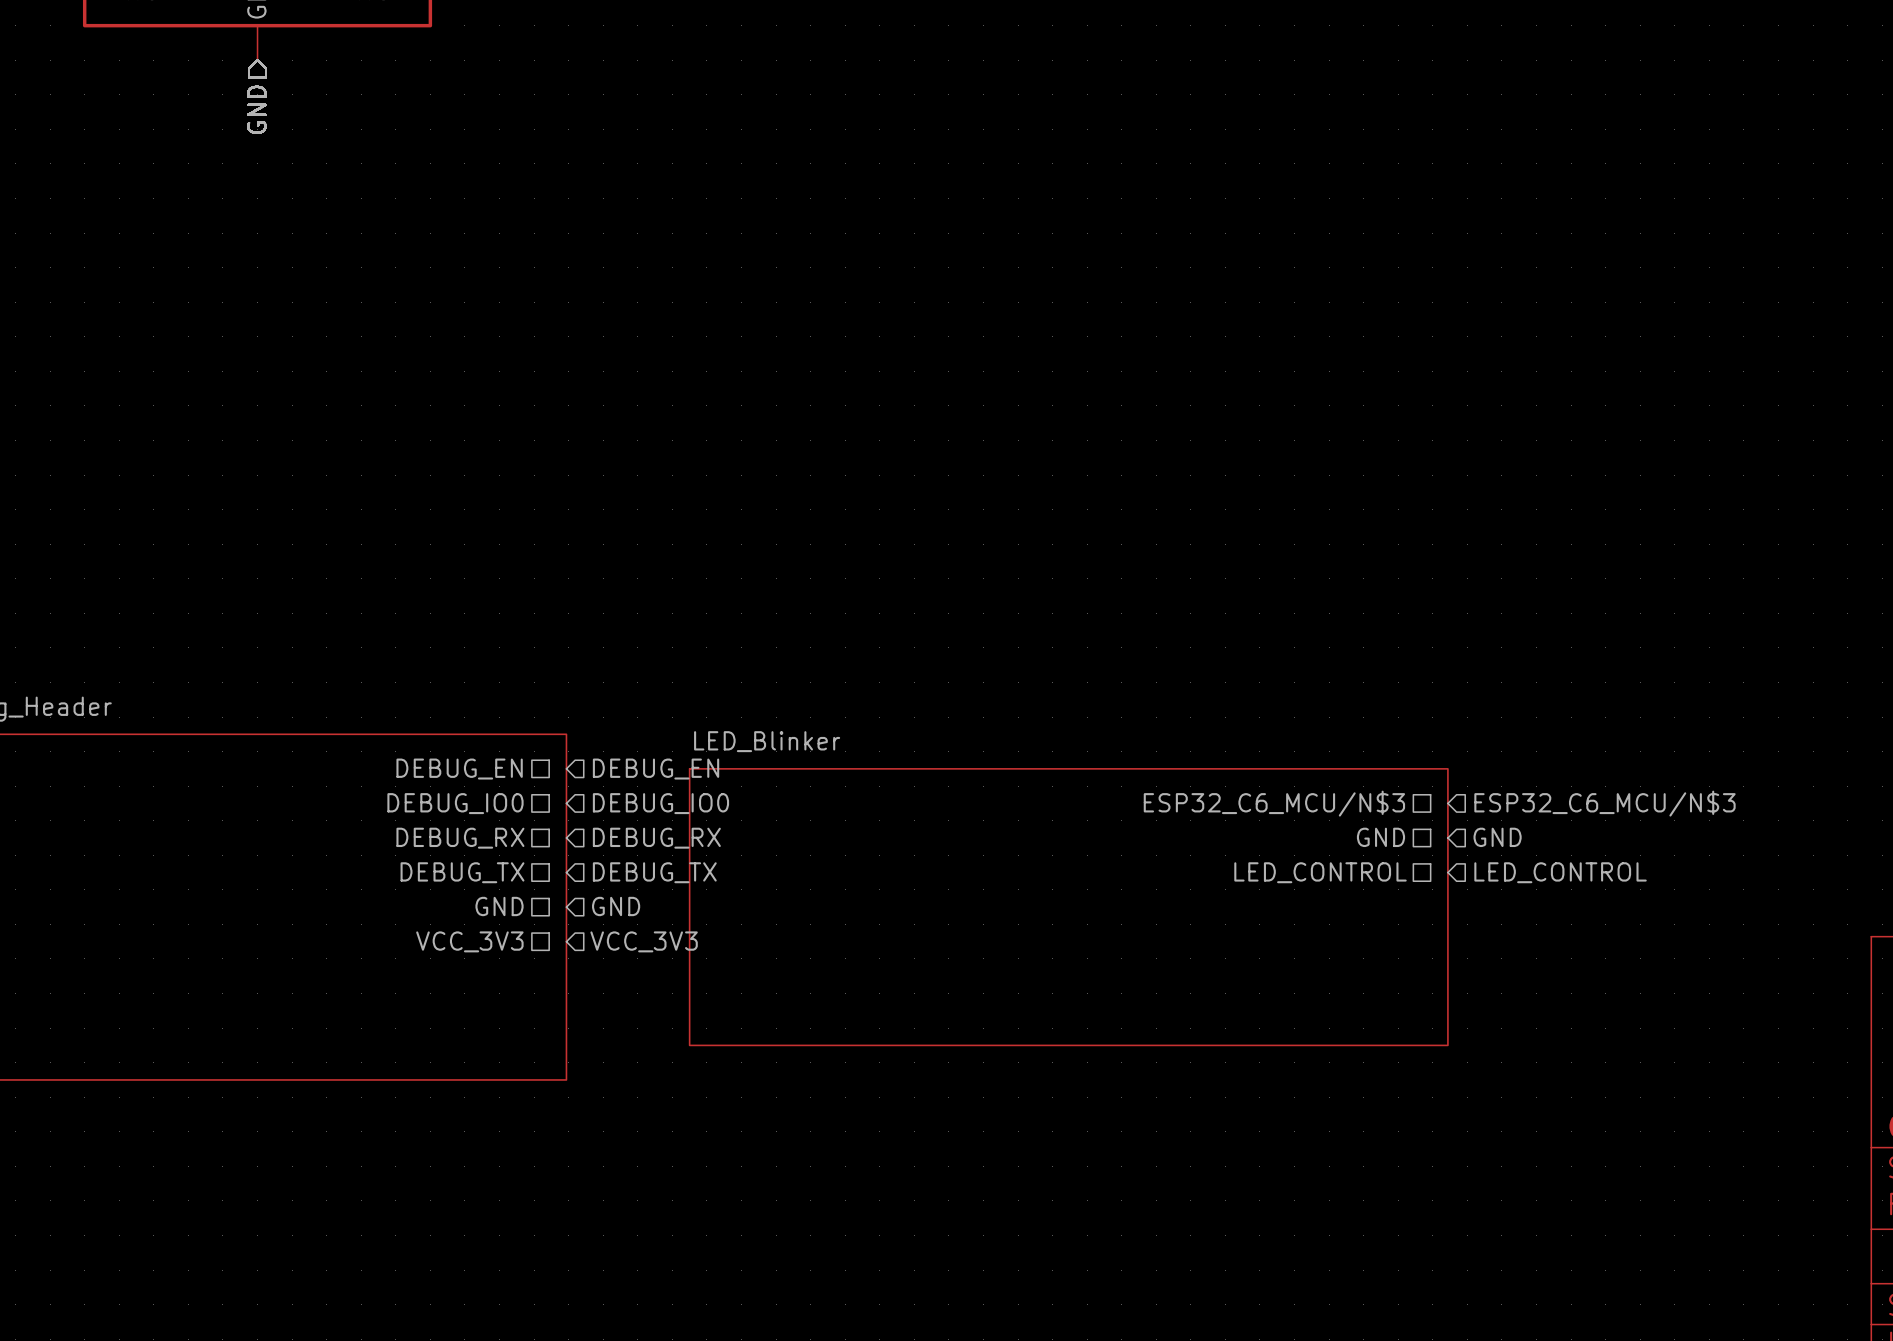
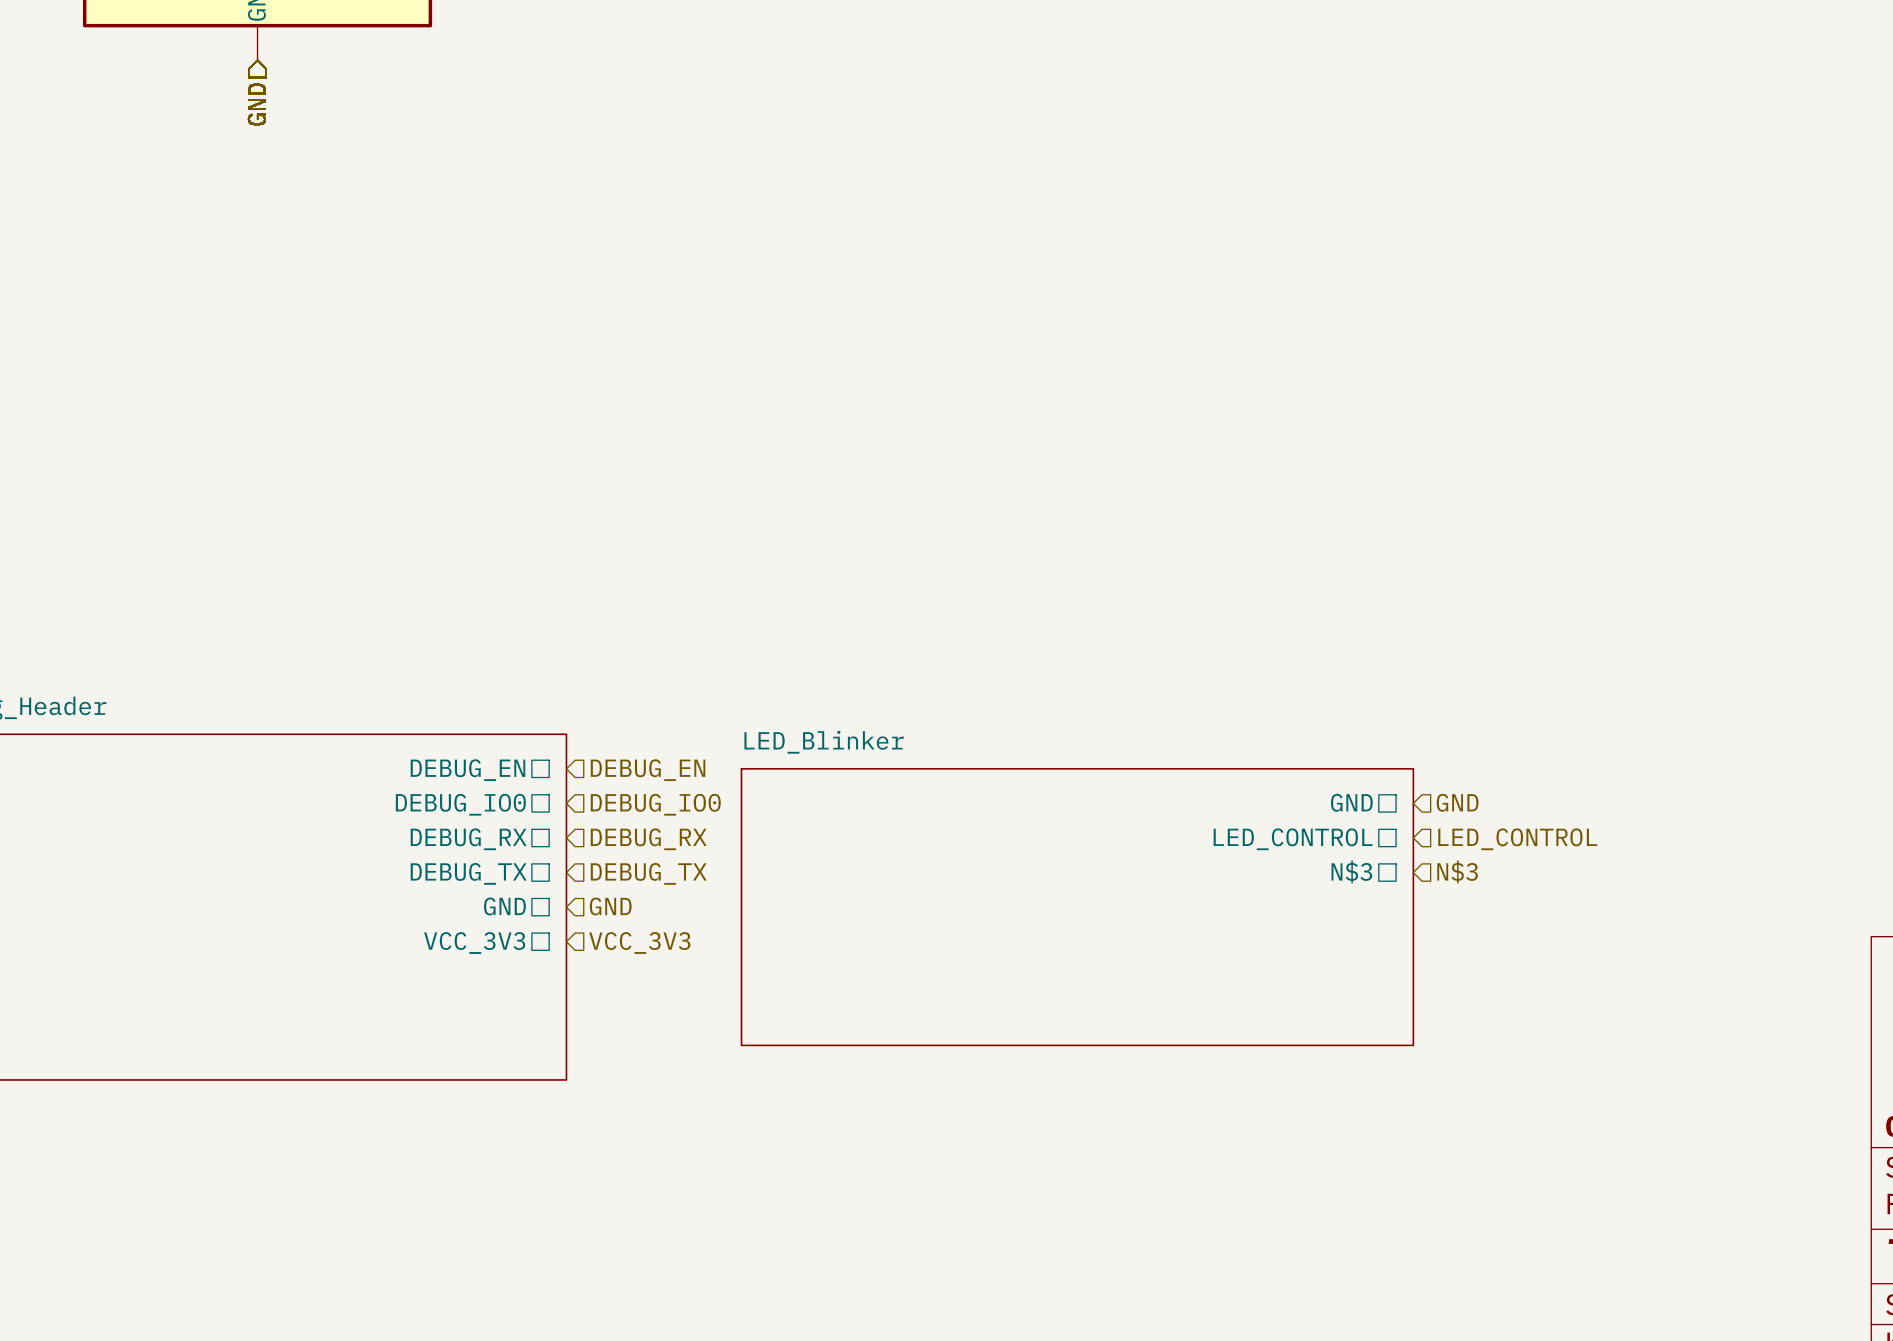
sheet LED_Blinker name position: LED_Blinker (767, 741) -> LED_Blinker (824, 742)
sheet LED_Blinker shape: [688, 768, 1449, 1047] -> [740, 768, 1415, 1047]
sheet pin: ESP32_C6_MCU/N$3 (1274, 803) -> none
hierarchical label: ESP32_C6_MCU/N$3 (1604, 803) -> none
sheet pin position: GND (1380, 837) -> GND (1351, 802)
hierarchical label position: GND (1497, 837) -> GND (1457, 802)
sheet pin: none -> N$3 (1351, 871)
hierarchical label: none -> N$3 (1457, 871)
sheet pin position: LED_CONTROL (1320, 872) -> LED_CONTROL (1293, 839)
hierarchical label position: LED_CONTROL (1560, 872) -> LED_CONTROL (1517, 839)

